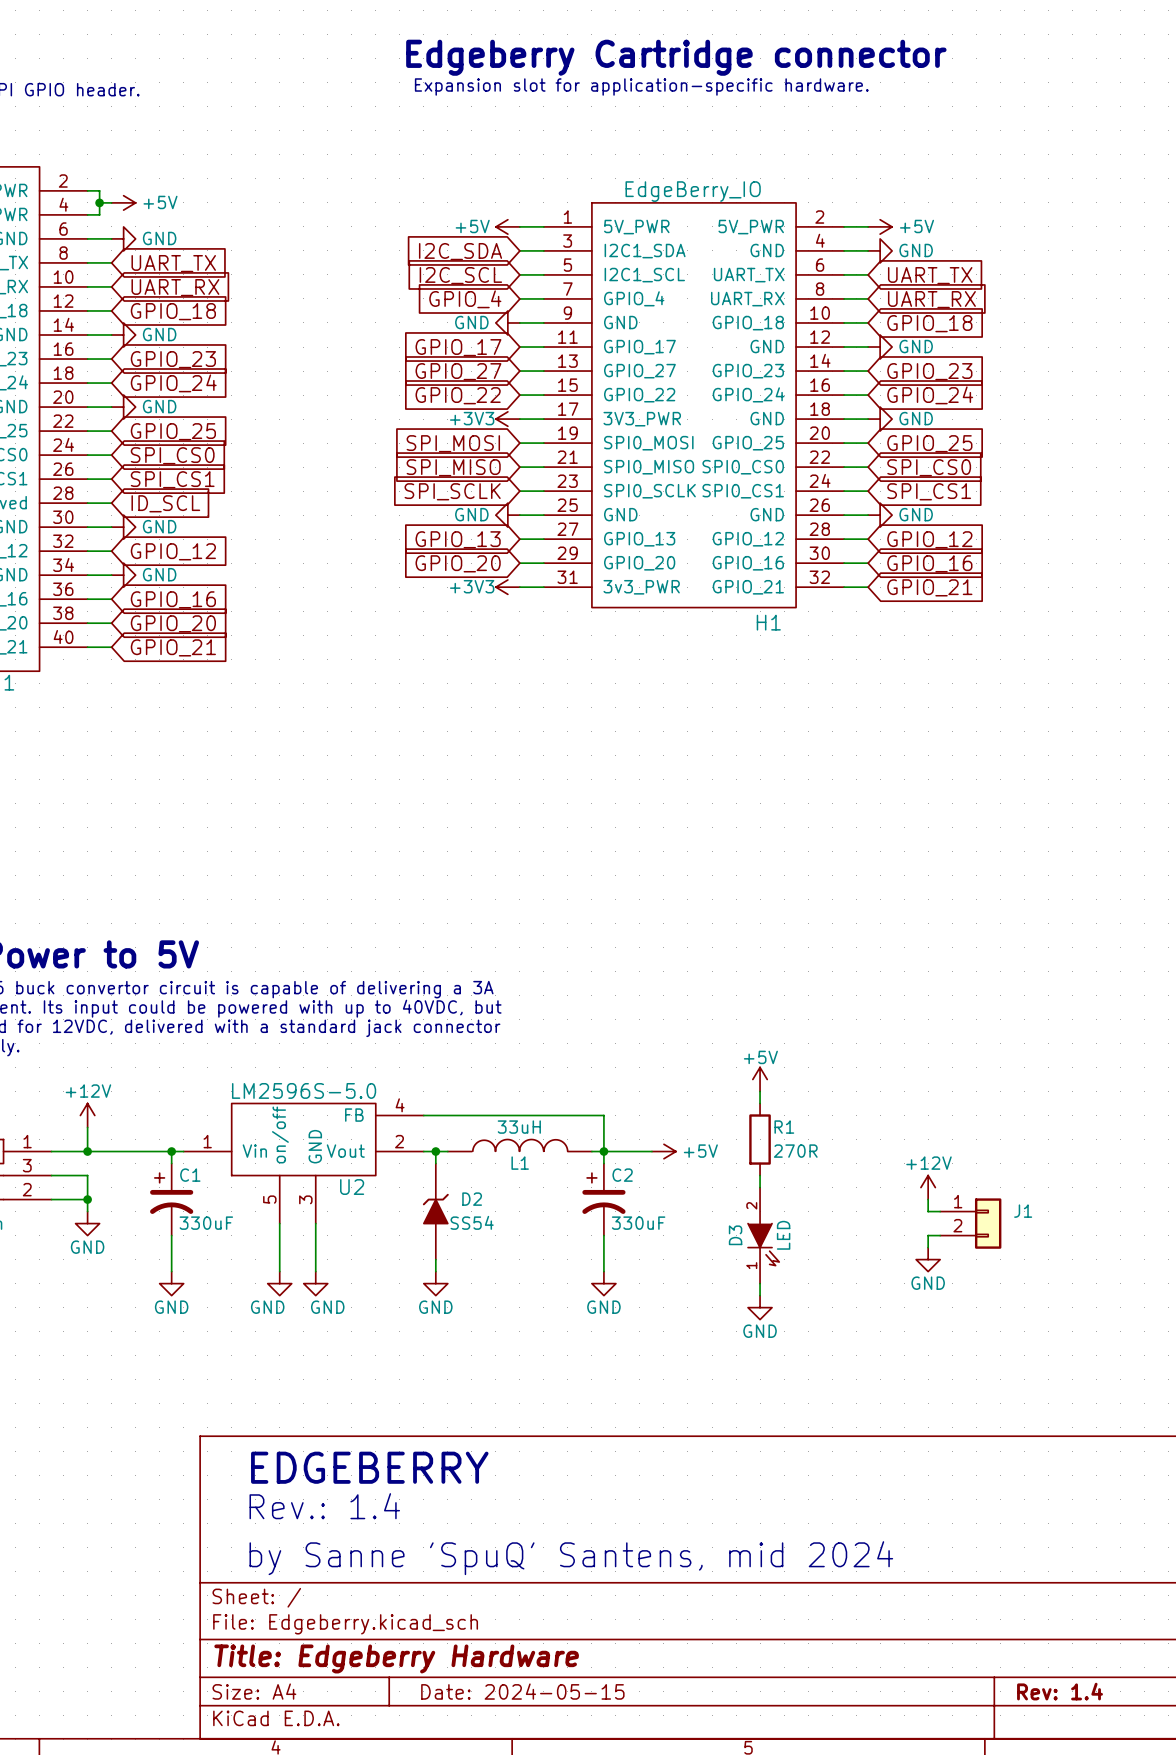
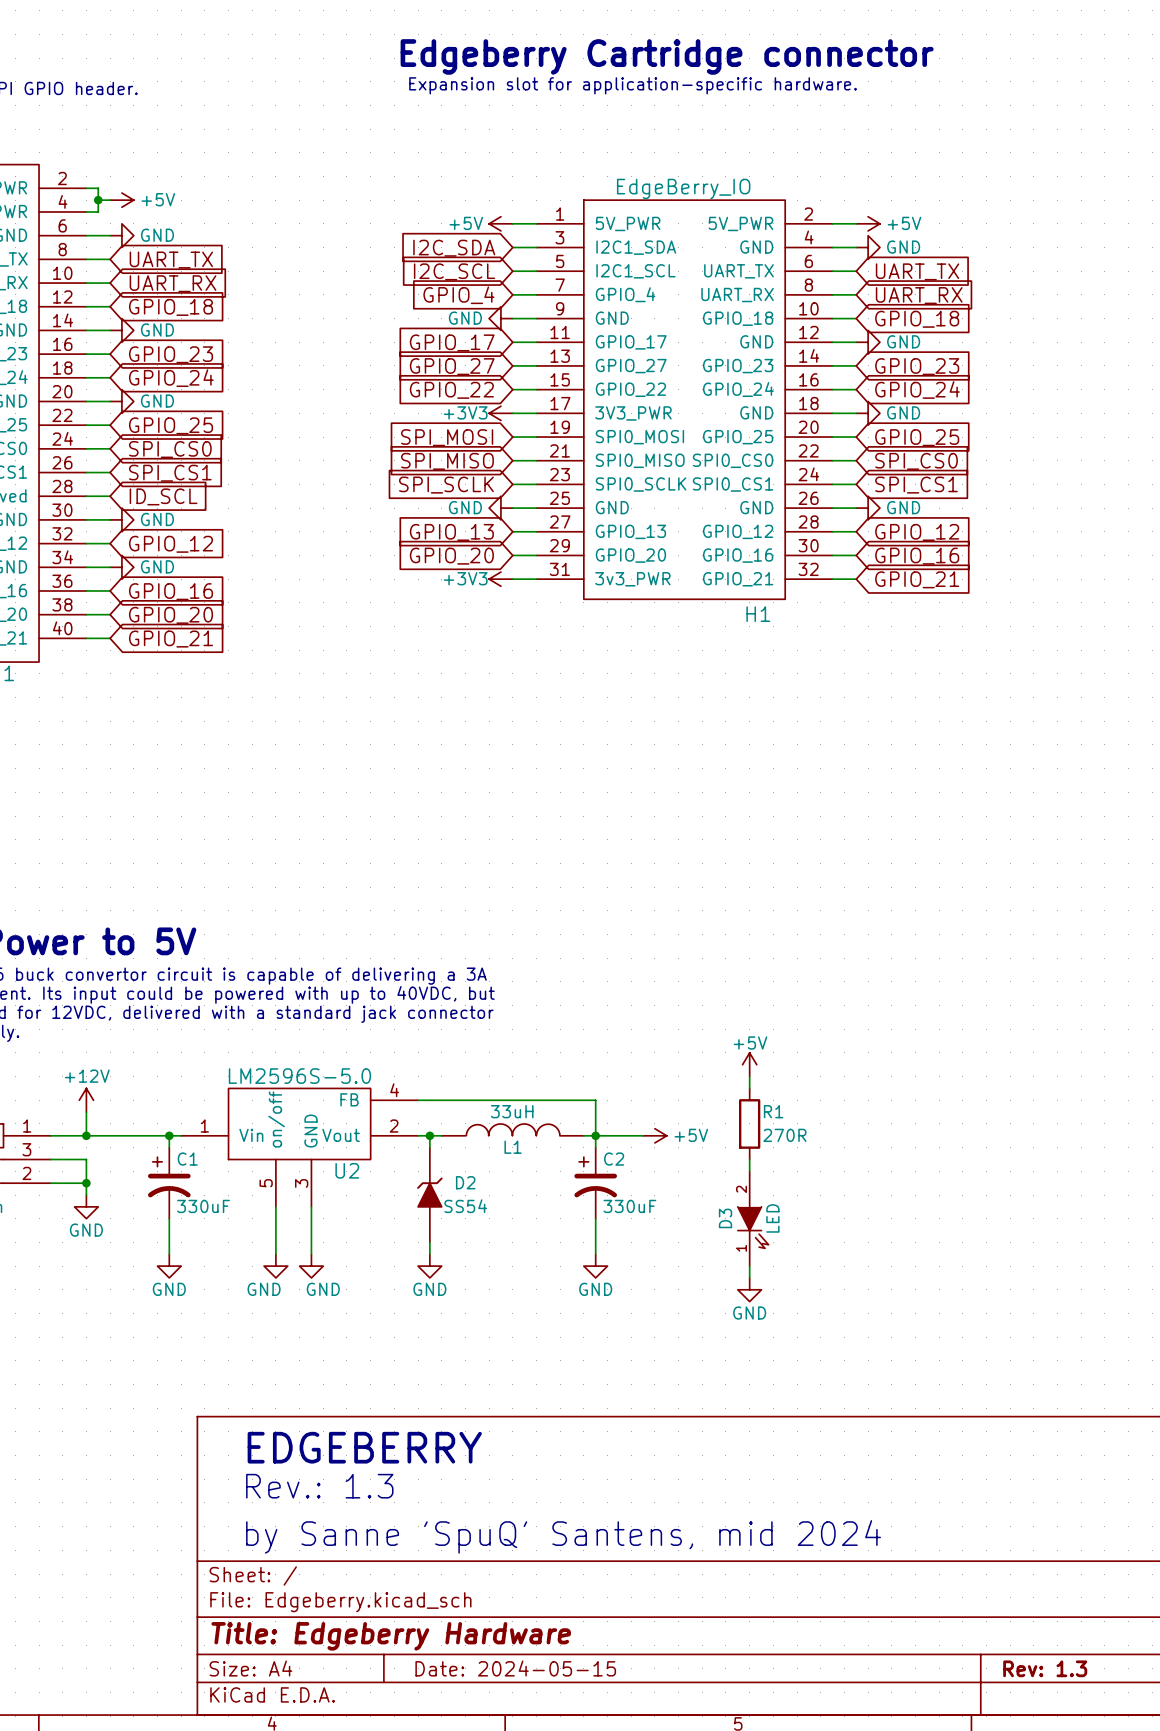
power symbol: +12V (928, 1187) -> none
wire: (928, 1199) (928, 1211) (940, 1211) -> none
J1: (970, 1223) -> none
wire: (940, 1235) (928, 1235) (928, 1247) -> none
power symbol: GND (928, 1259) -> none
text: Rev.: 1.4 (324, 1506) -> Rev.: 1.3 (319, 1486)
title block: Rev: 1.4 (1060, 1691) -> Rev: 1.3 (1045, 1668)

